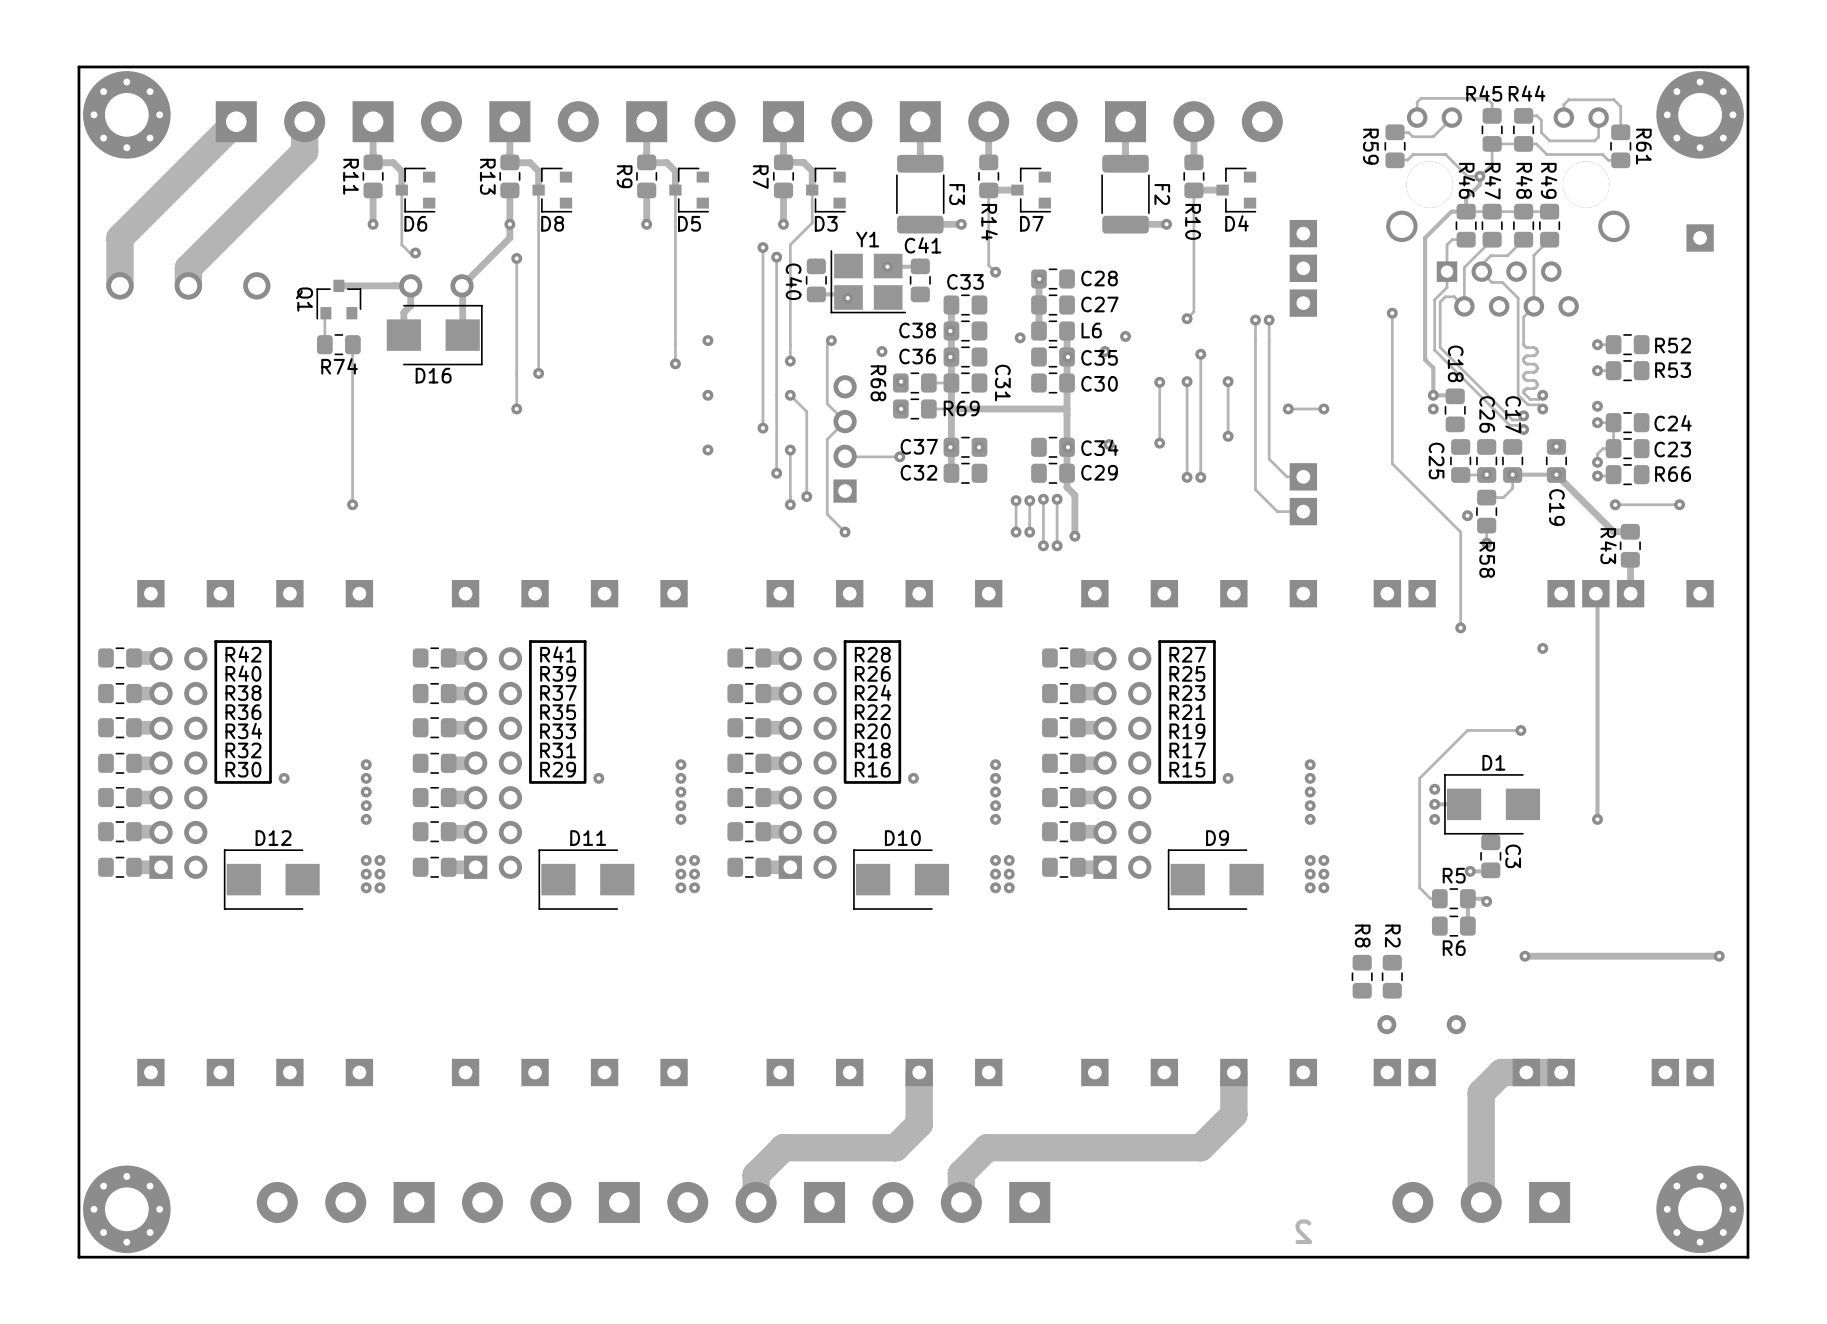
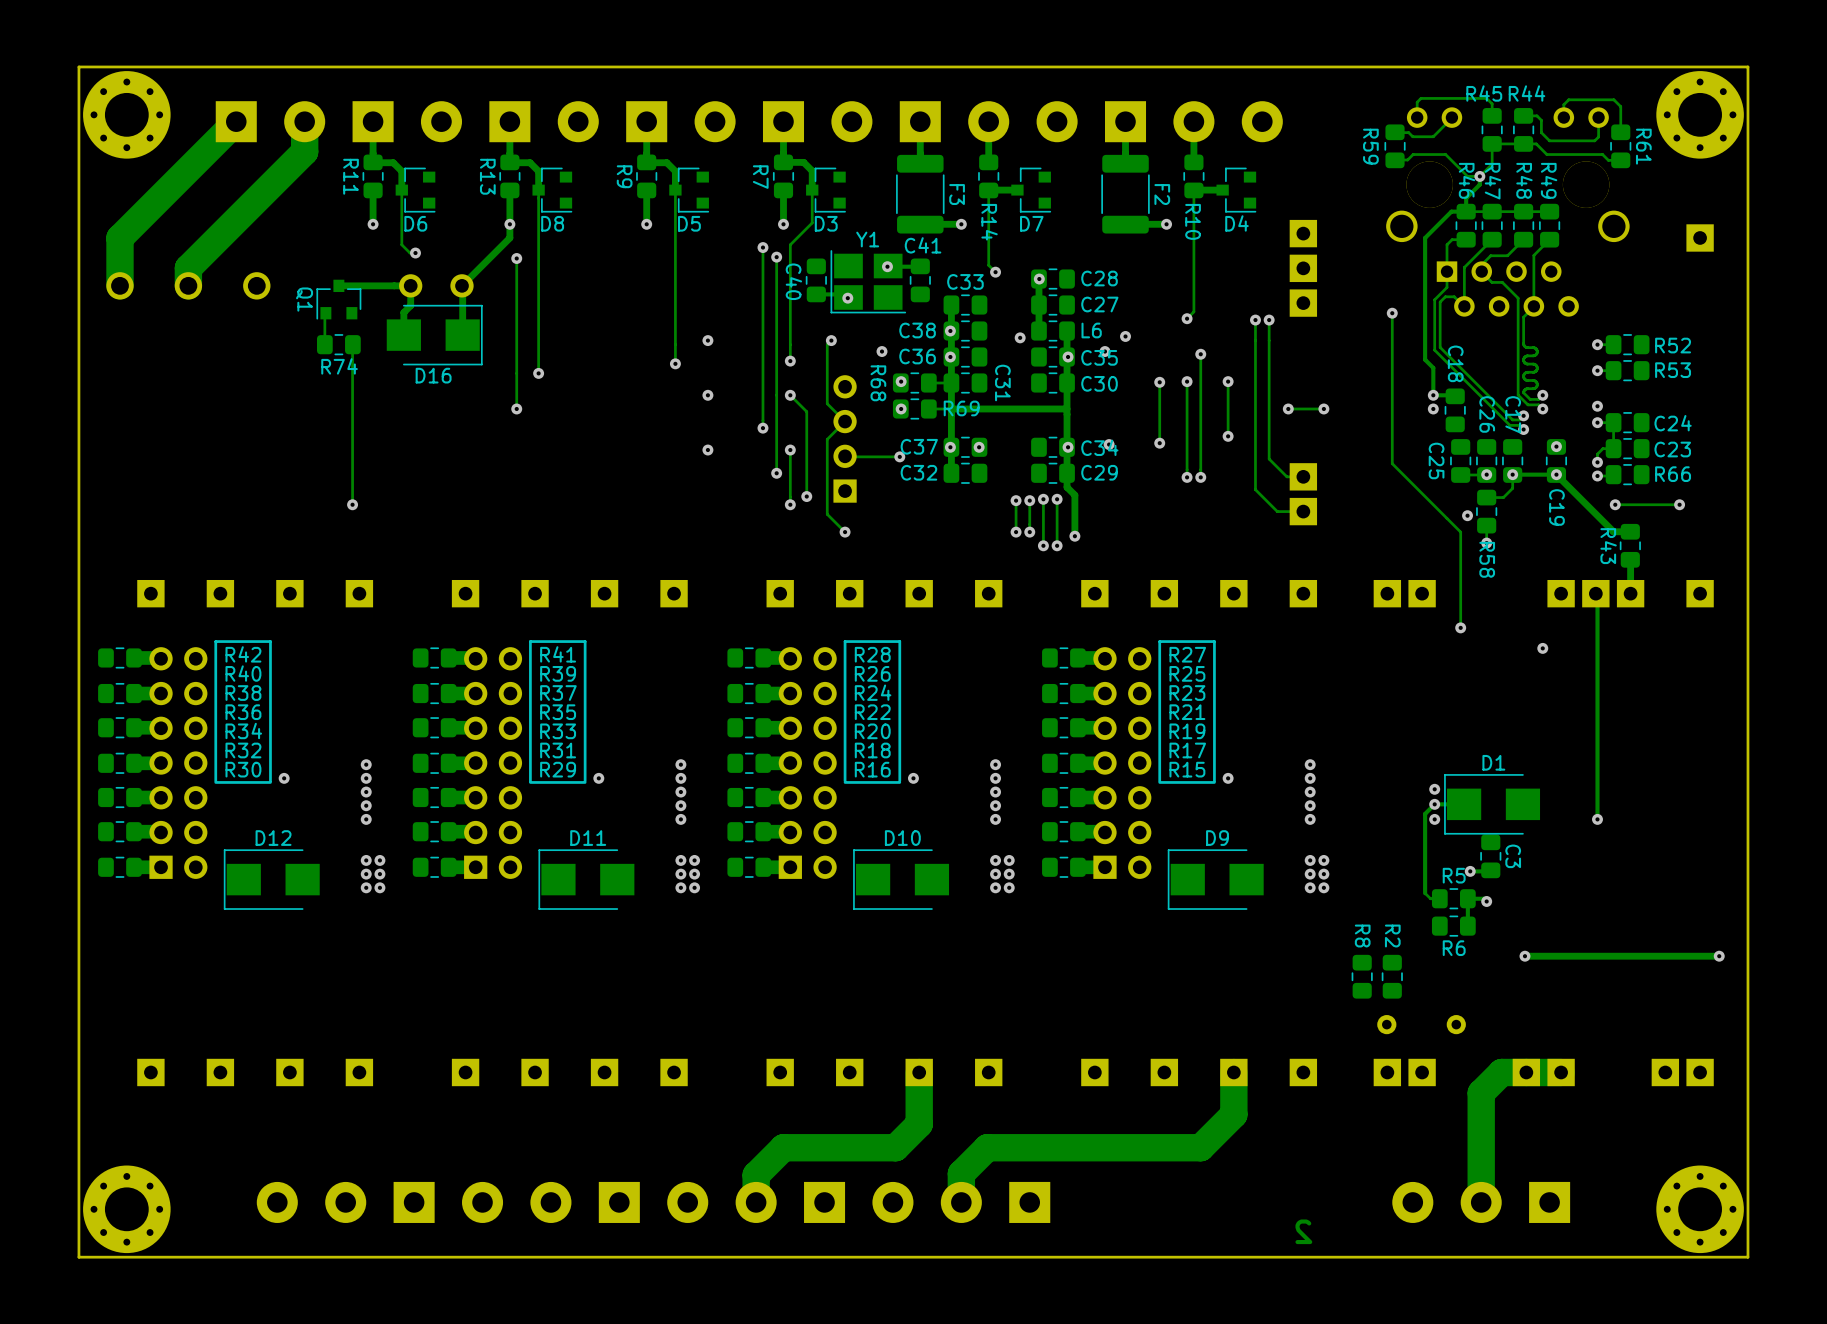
track: (1520, 730) (1467, 730) (1419, 778) (1419, 887) (1425, 893) -> (1434, 804) (1425, 813) (1425, 893)
via: (1520, 730) -> none

